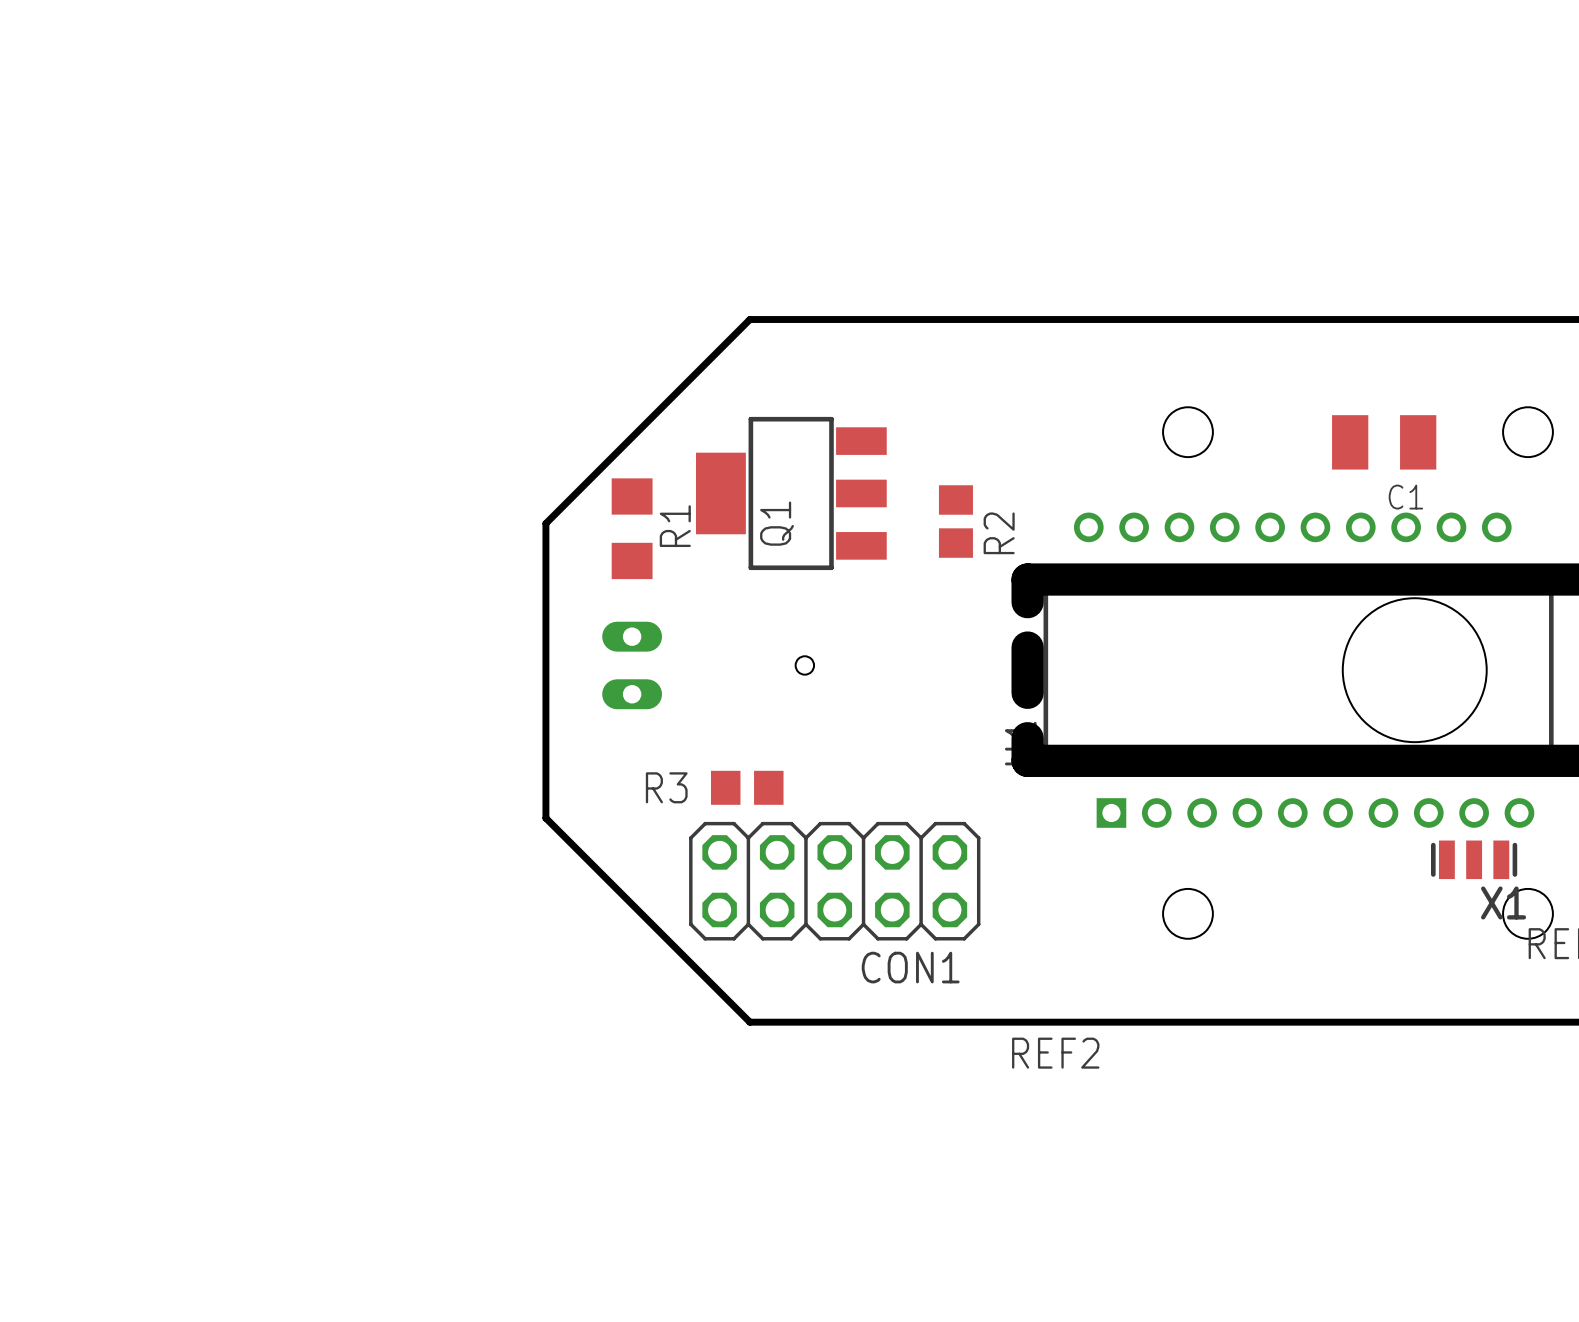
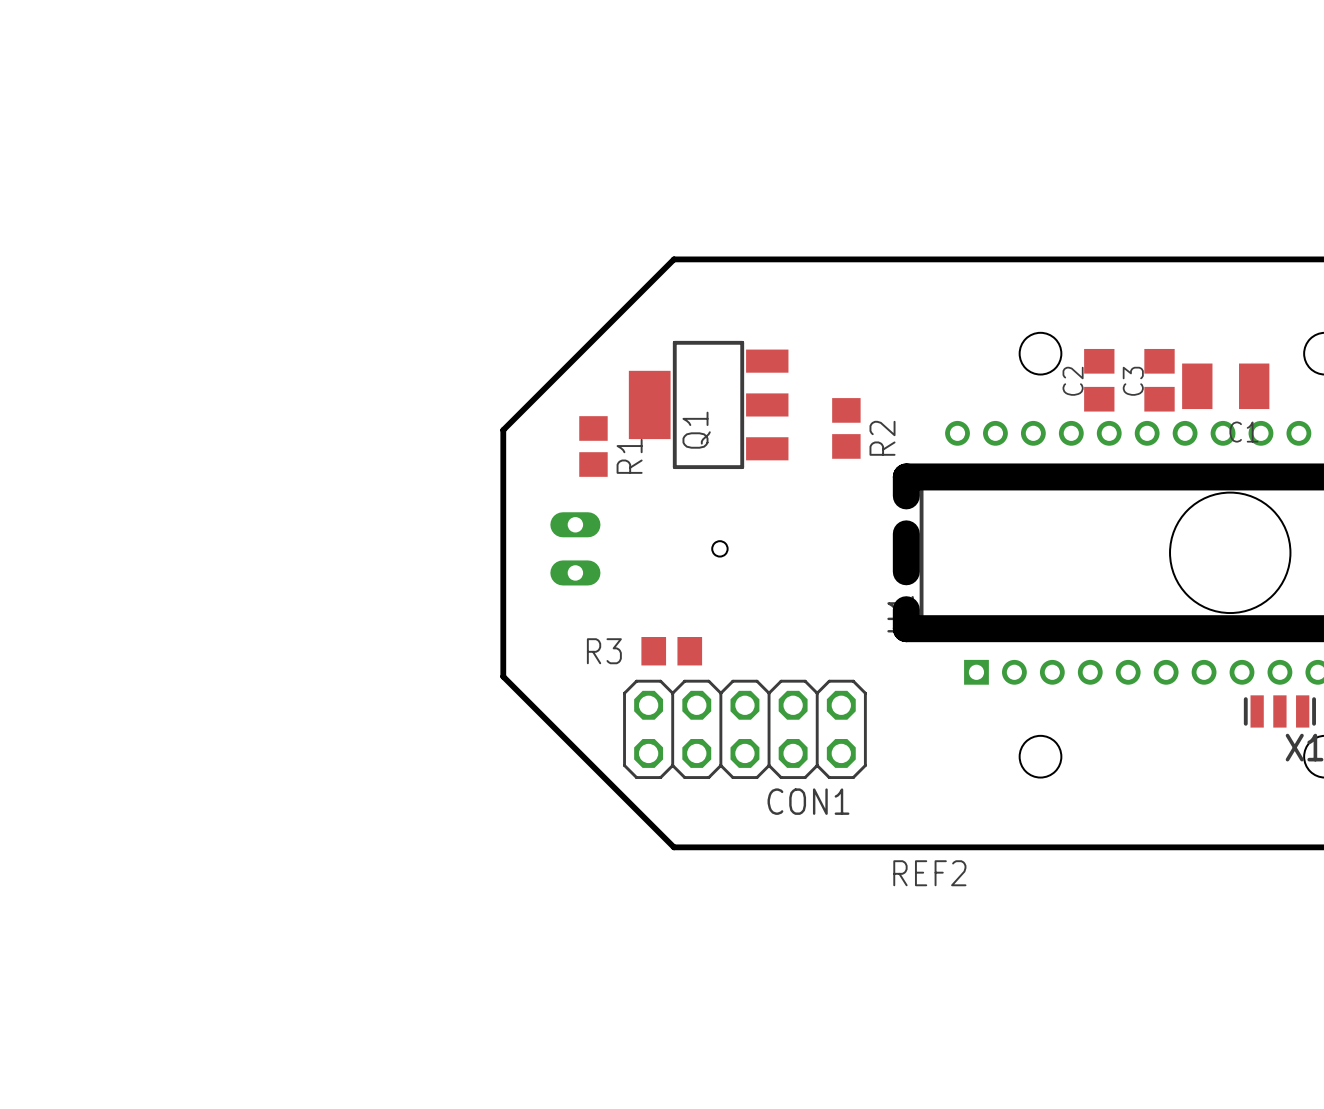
C1 position: (1384, 442) -> (1225, 386)
C2: none -> (1099, 380)
C3: none -> (1159, 380)
R1 footprint: [611, 478, 653, 580] -> [579, 416, 608, 477]

